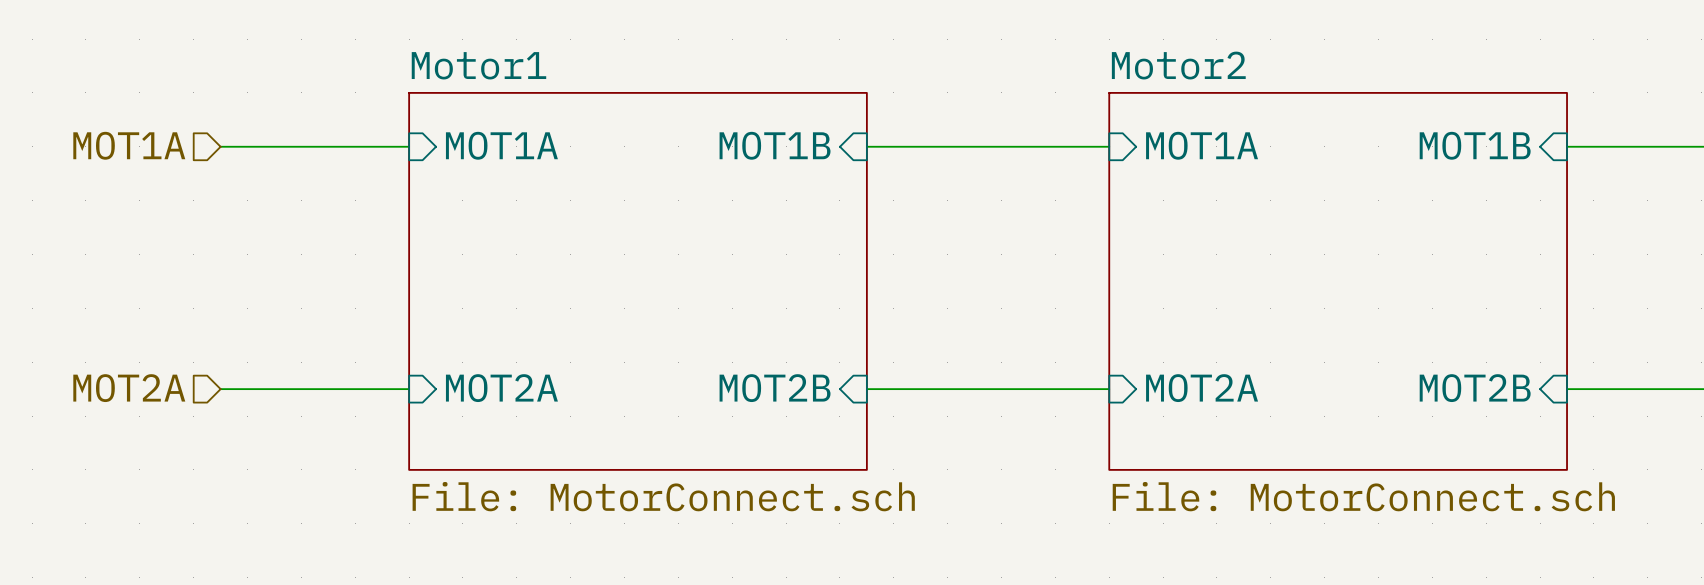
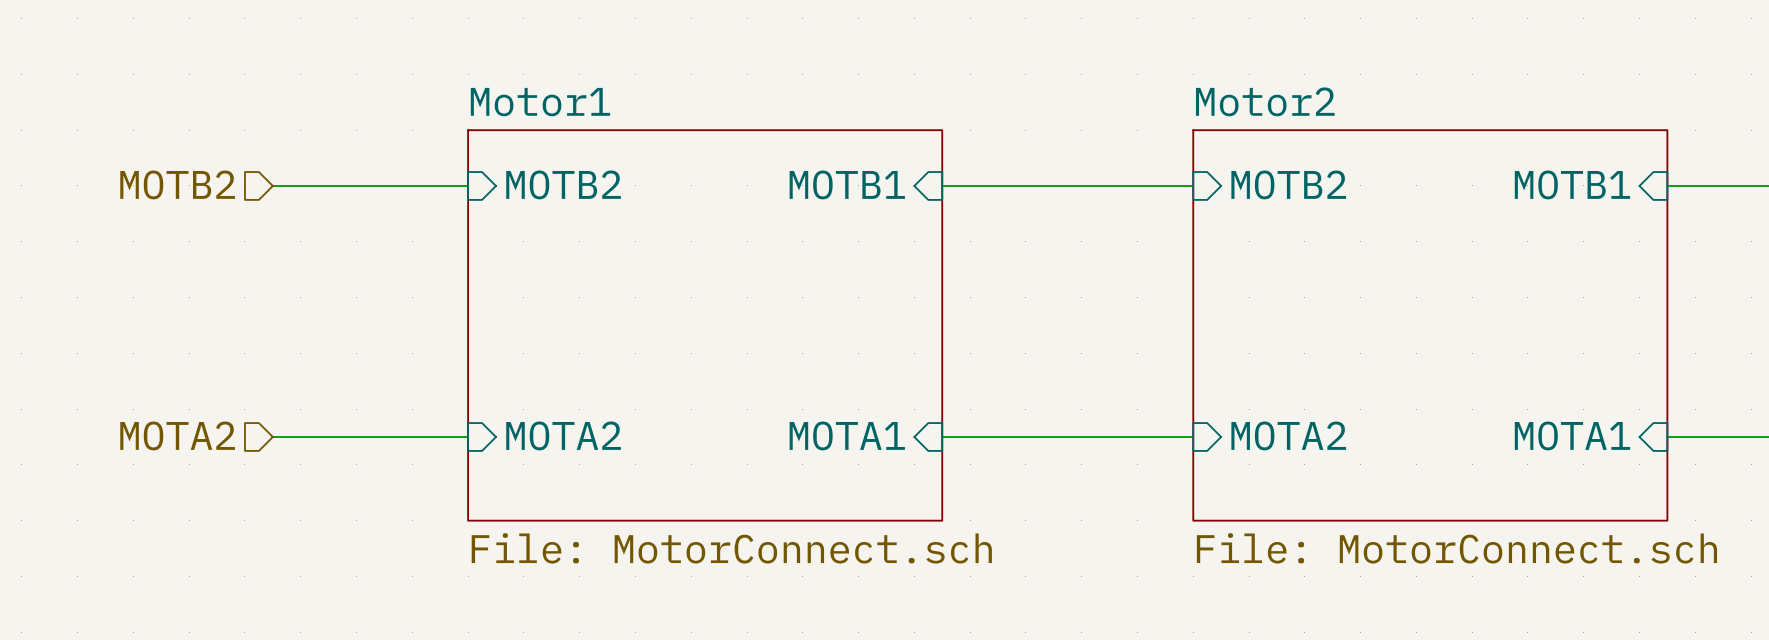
hierarchical label: MOT1A (129, 145) -> MOTB2 (177, 184)
sheet pin: MOT1A (501, 145) -> MOTB2 (563, 184)
sheet pin: MOT1B (775, 145) -> MOTB1 (847, 184)
sheet pin: MOT1A (1202, 145) -> MOTB2 (1288, 184)
sheet pin: MOT1B (1475, 145) -> MOTB1 (1572, 184)
hierarchical label: MOT2A (129, 388) -> MOTA2 (177, 435)
sheet pin: MOT2A (501, 388) -> MOTA2 (563, 435)
sheet pin: MOT2B (775, 388) -> MOTA1 (847, 435)
sheet pin: MOT2A (1202, 388) -> MOTA2 (1288, 435)
sheet pin: MOT2B (1475, 388) -> MOTA1 (1572, 435)

